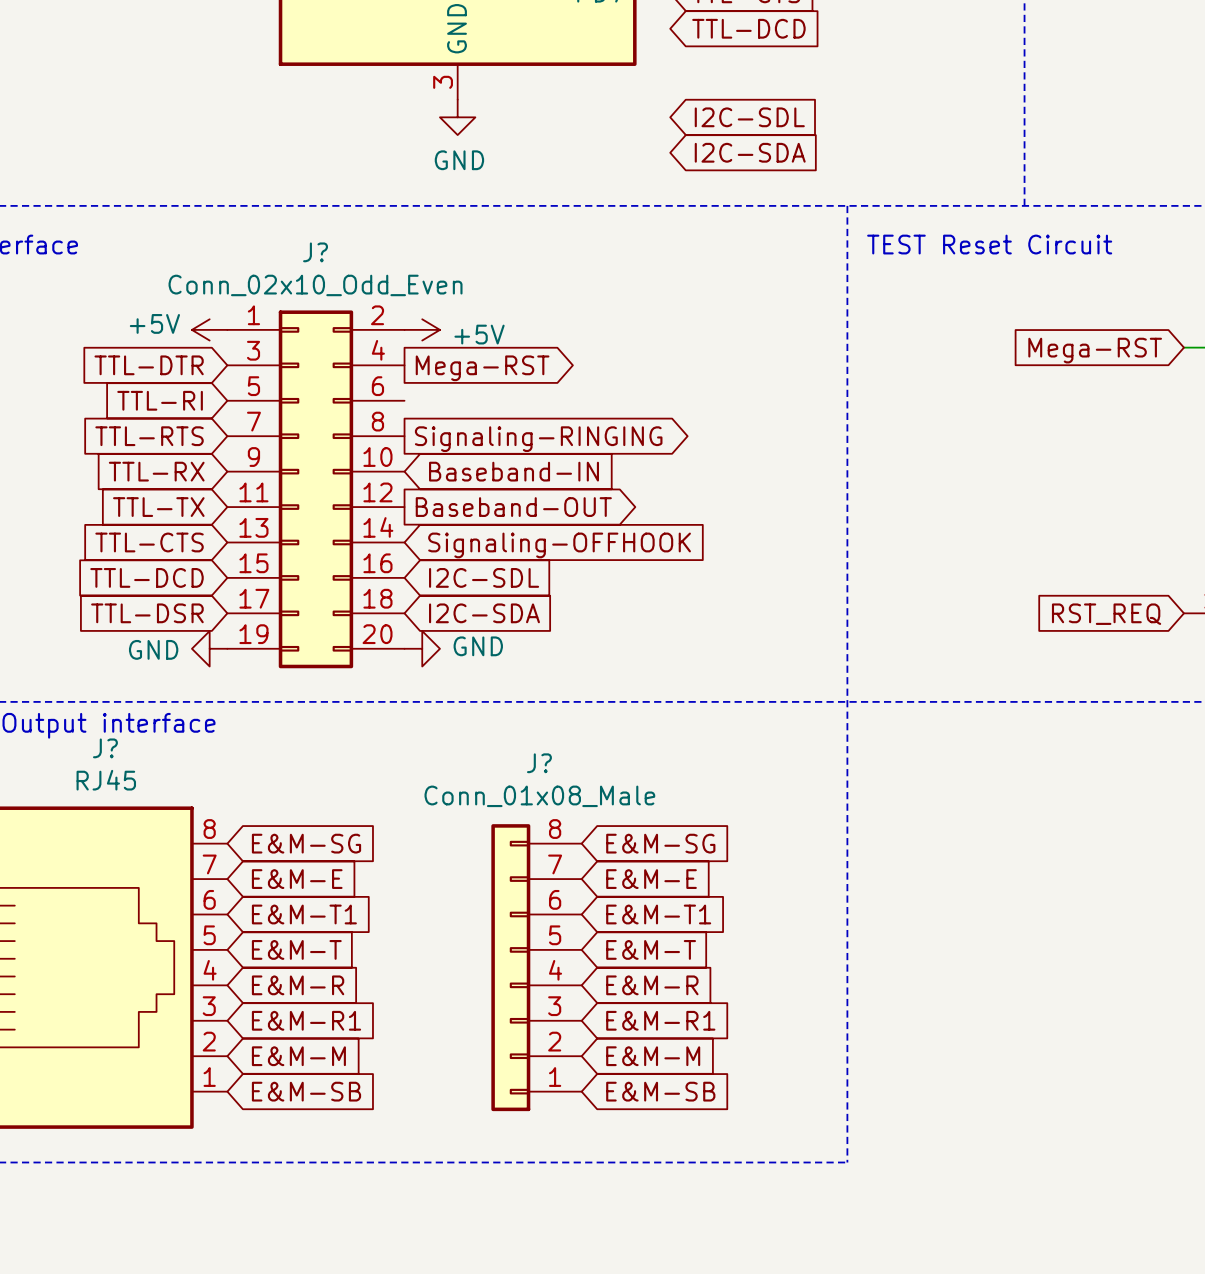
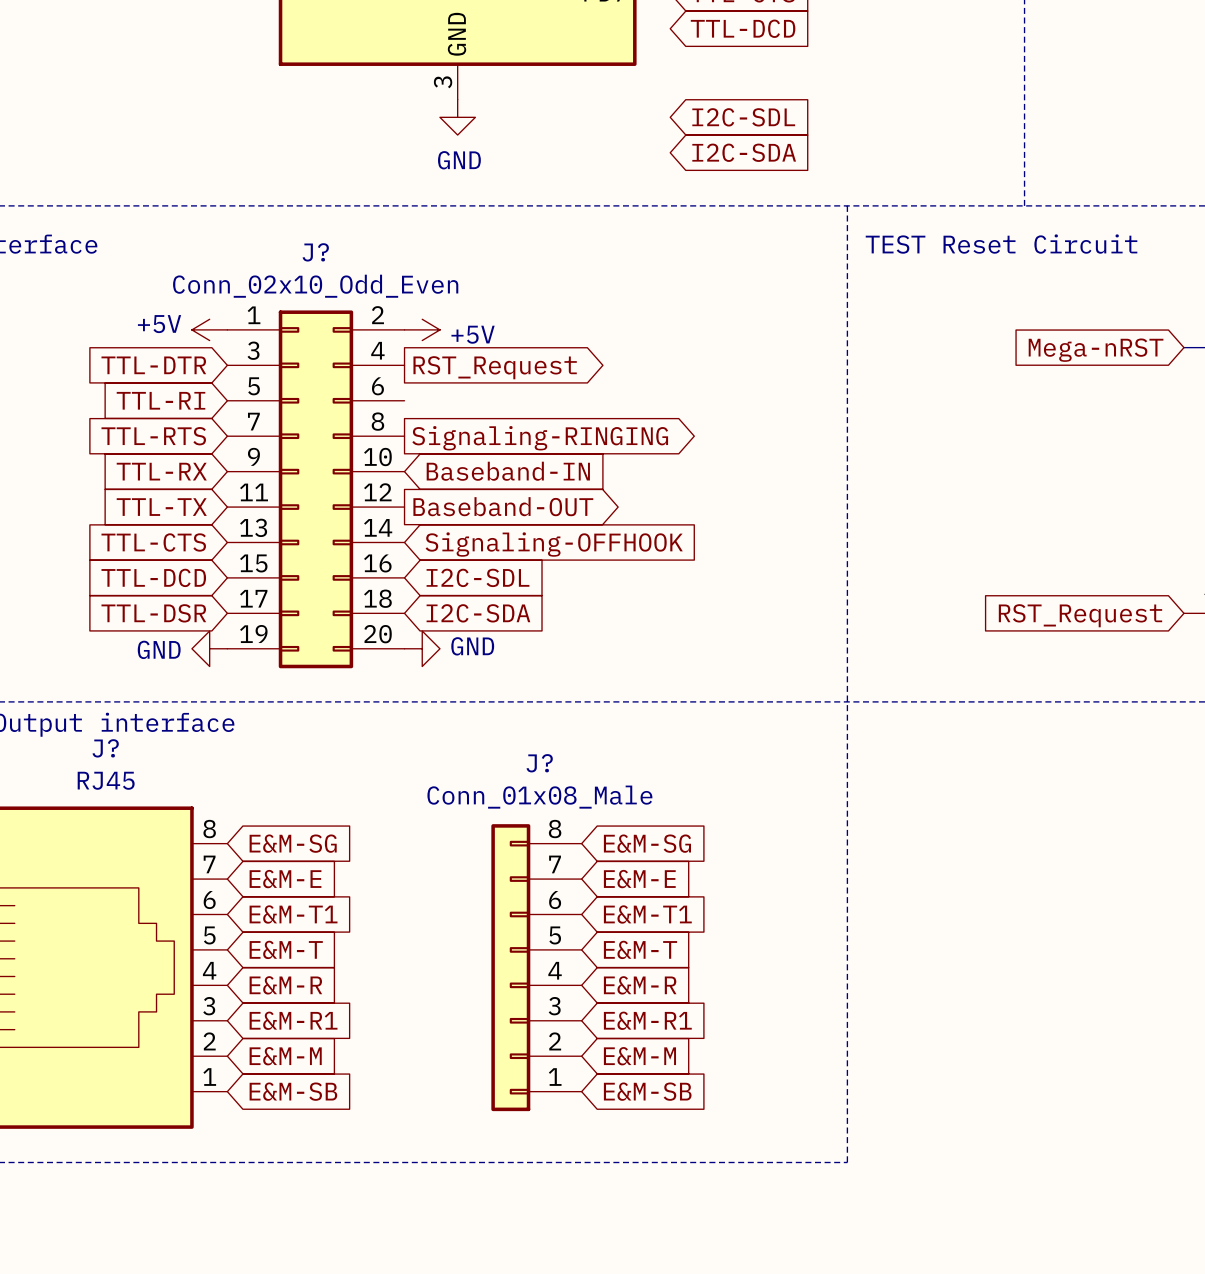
global label: Mega-RST (1095, 350) -> Mega-nRST (1096, 350)
global label: Mega-RST (482, 368) -> RST_Request (495, 367)
global label: RST_REQ (1106, 614) -> RST_Request (1080, 615)

